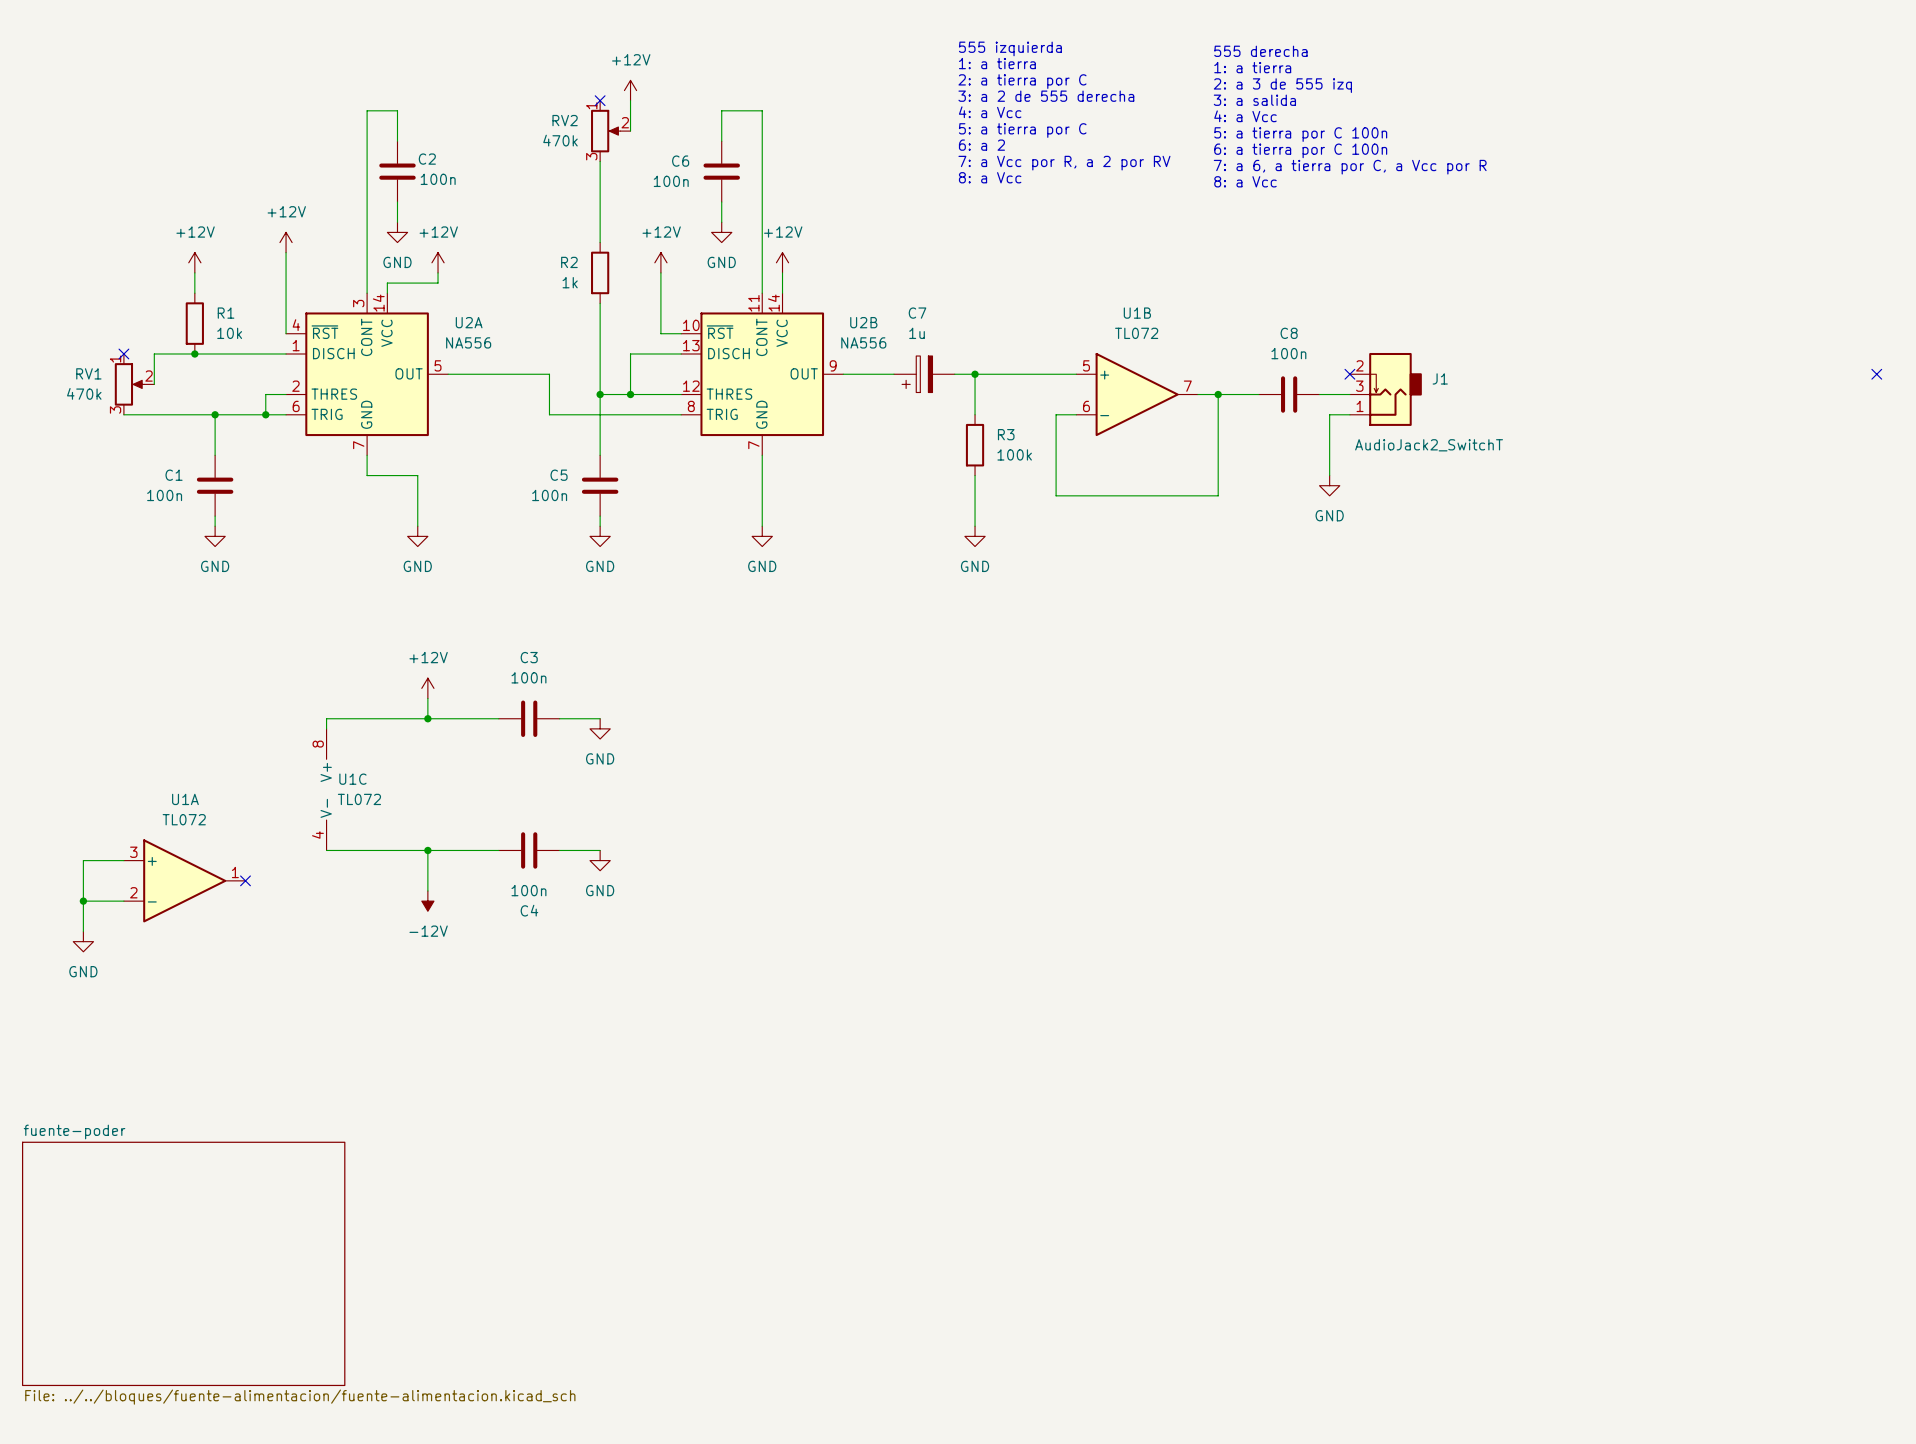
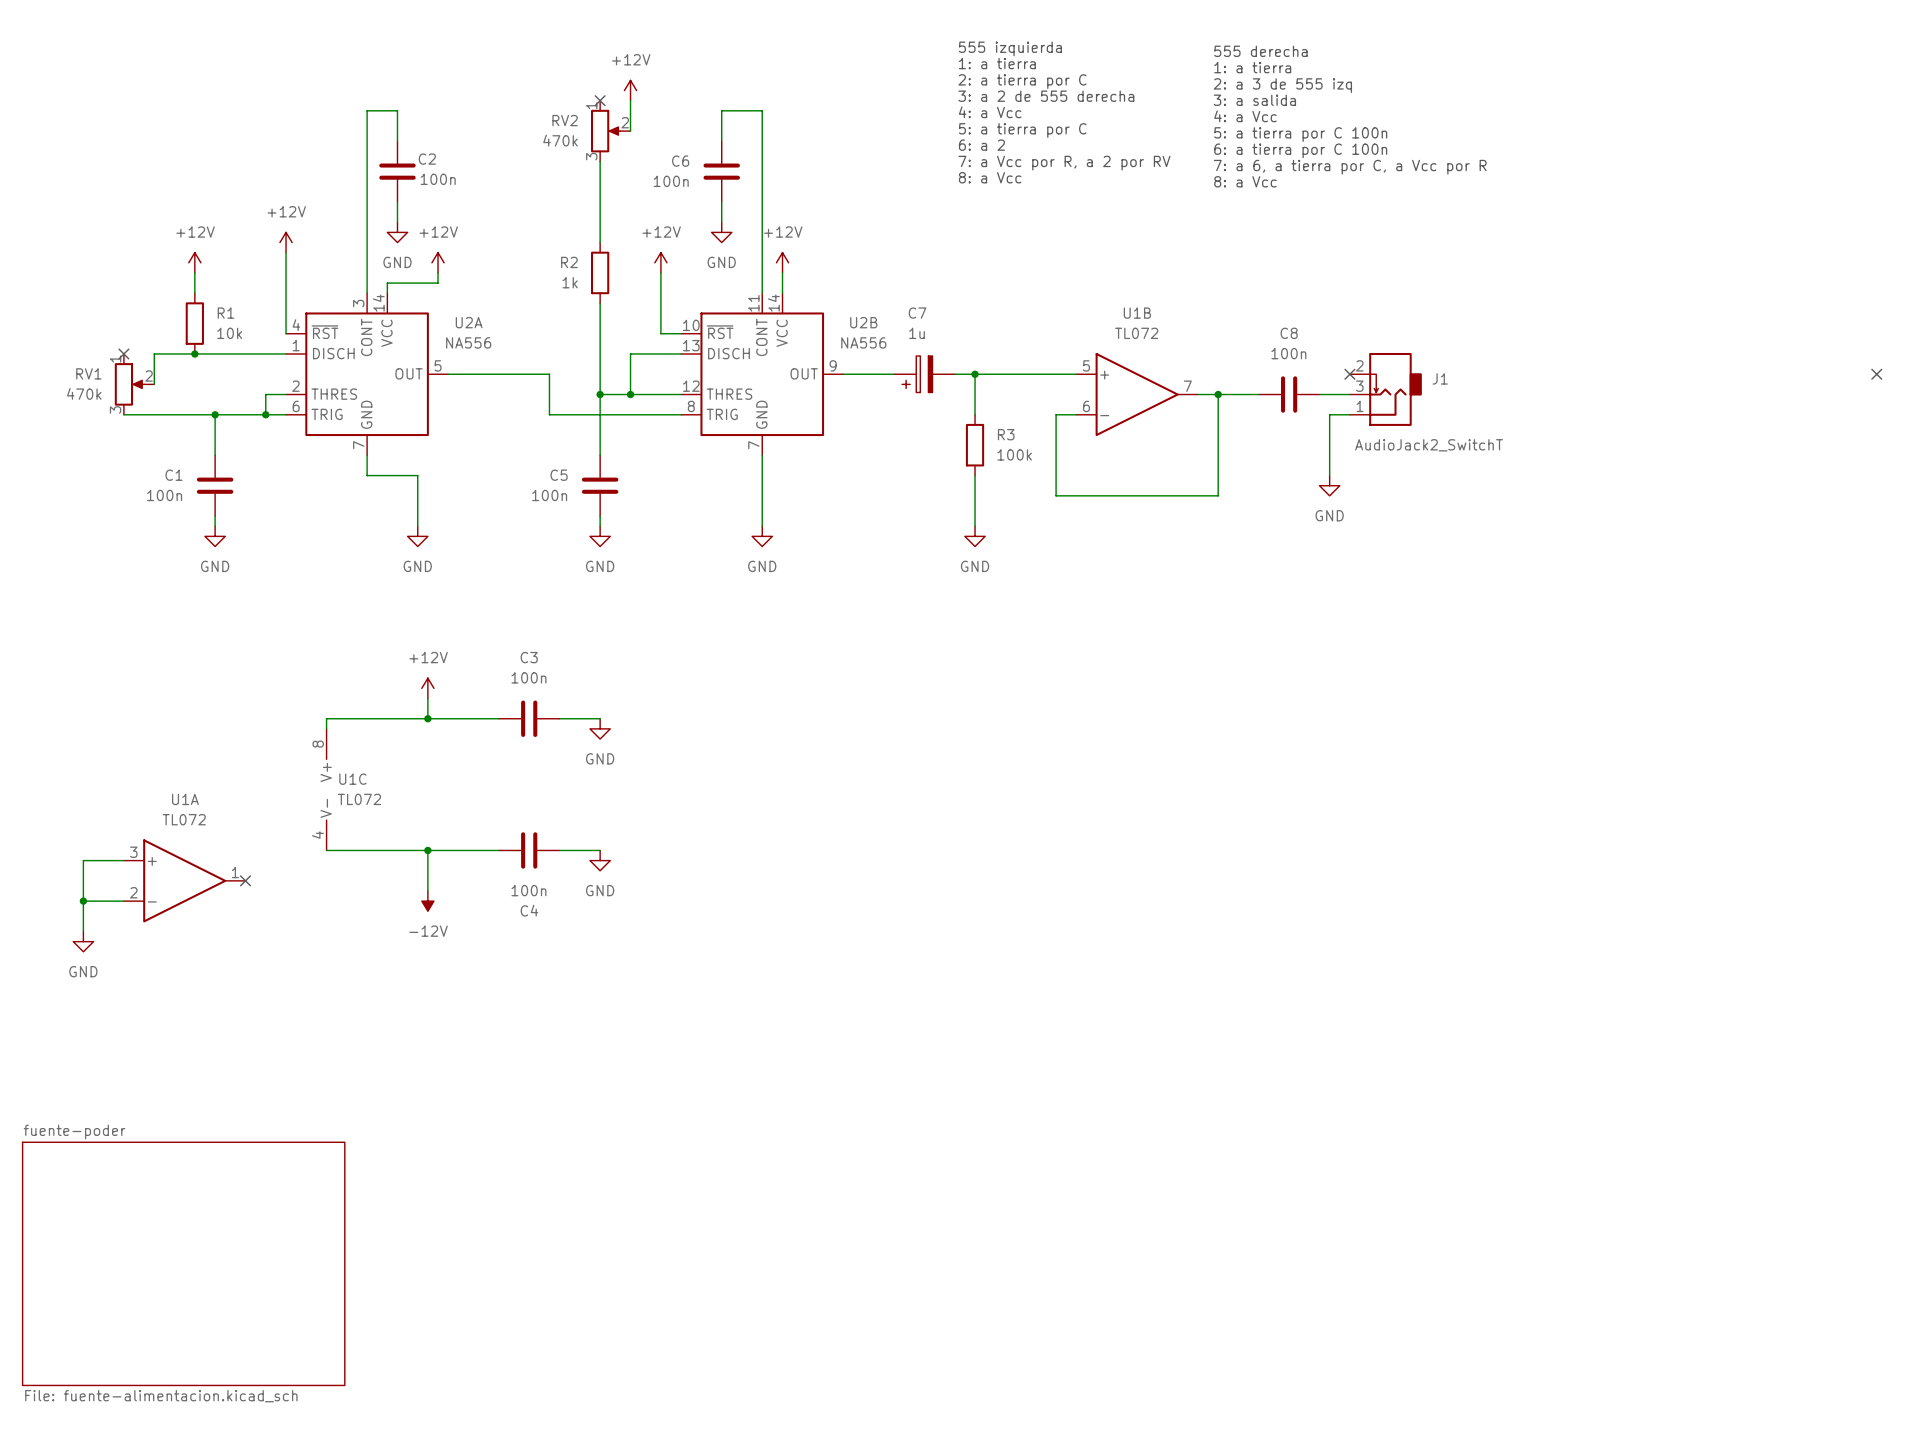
sheet fuente-poder value: File: ../../bloques/fuente-alimentacion/fuente-alimentacion.kicad_sch (300, 1397) -> File: fuente-alimentacion.kicad_sch (161, 1396)

